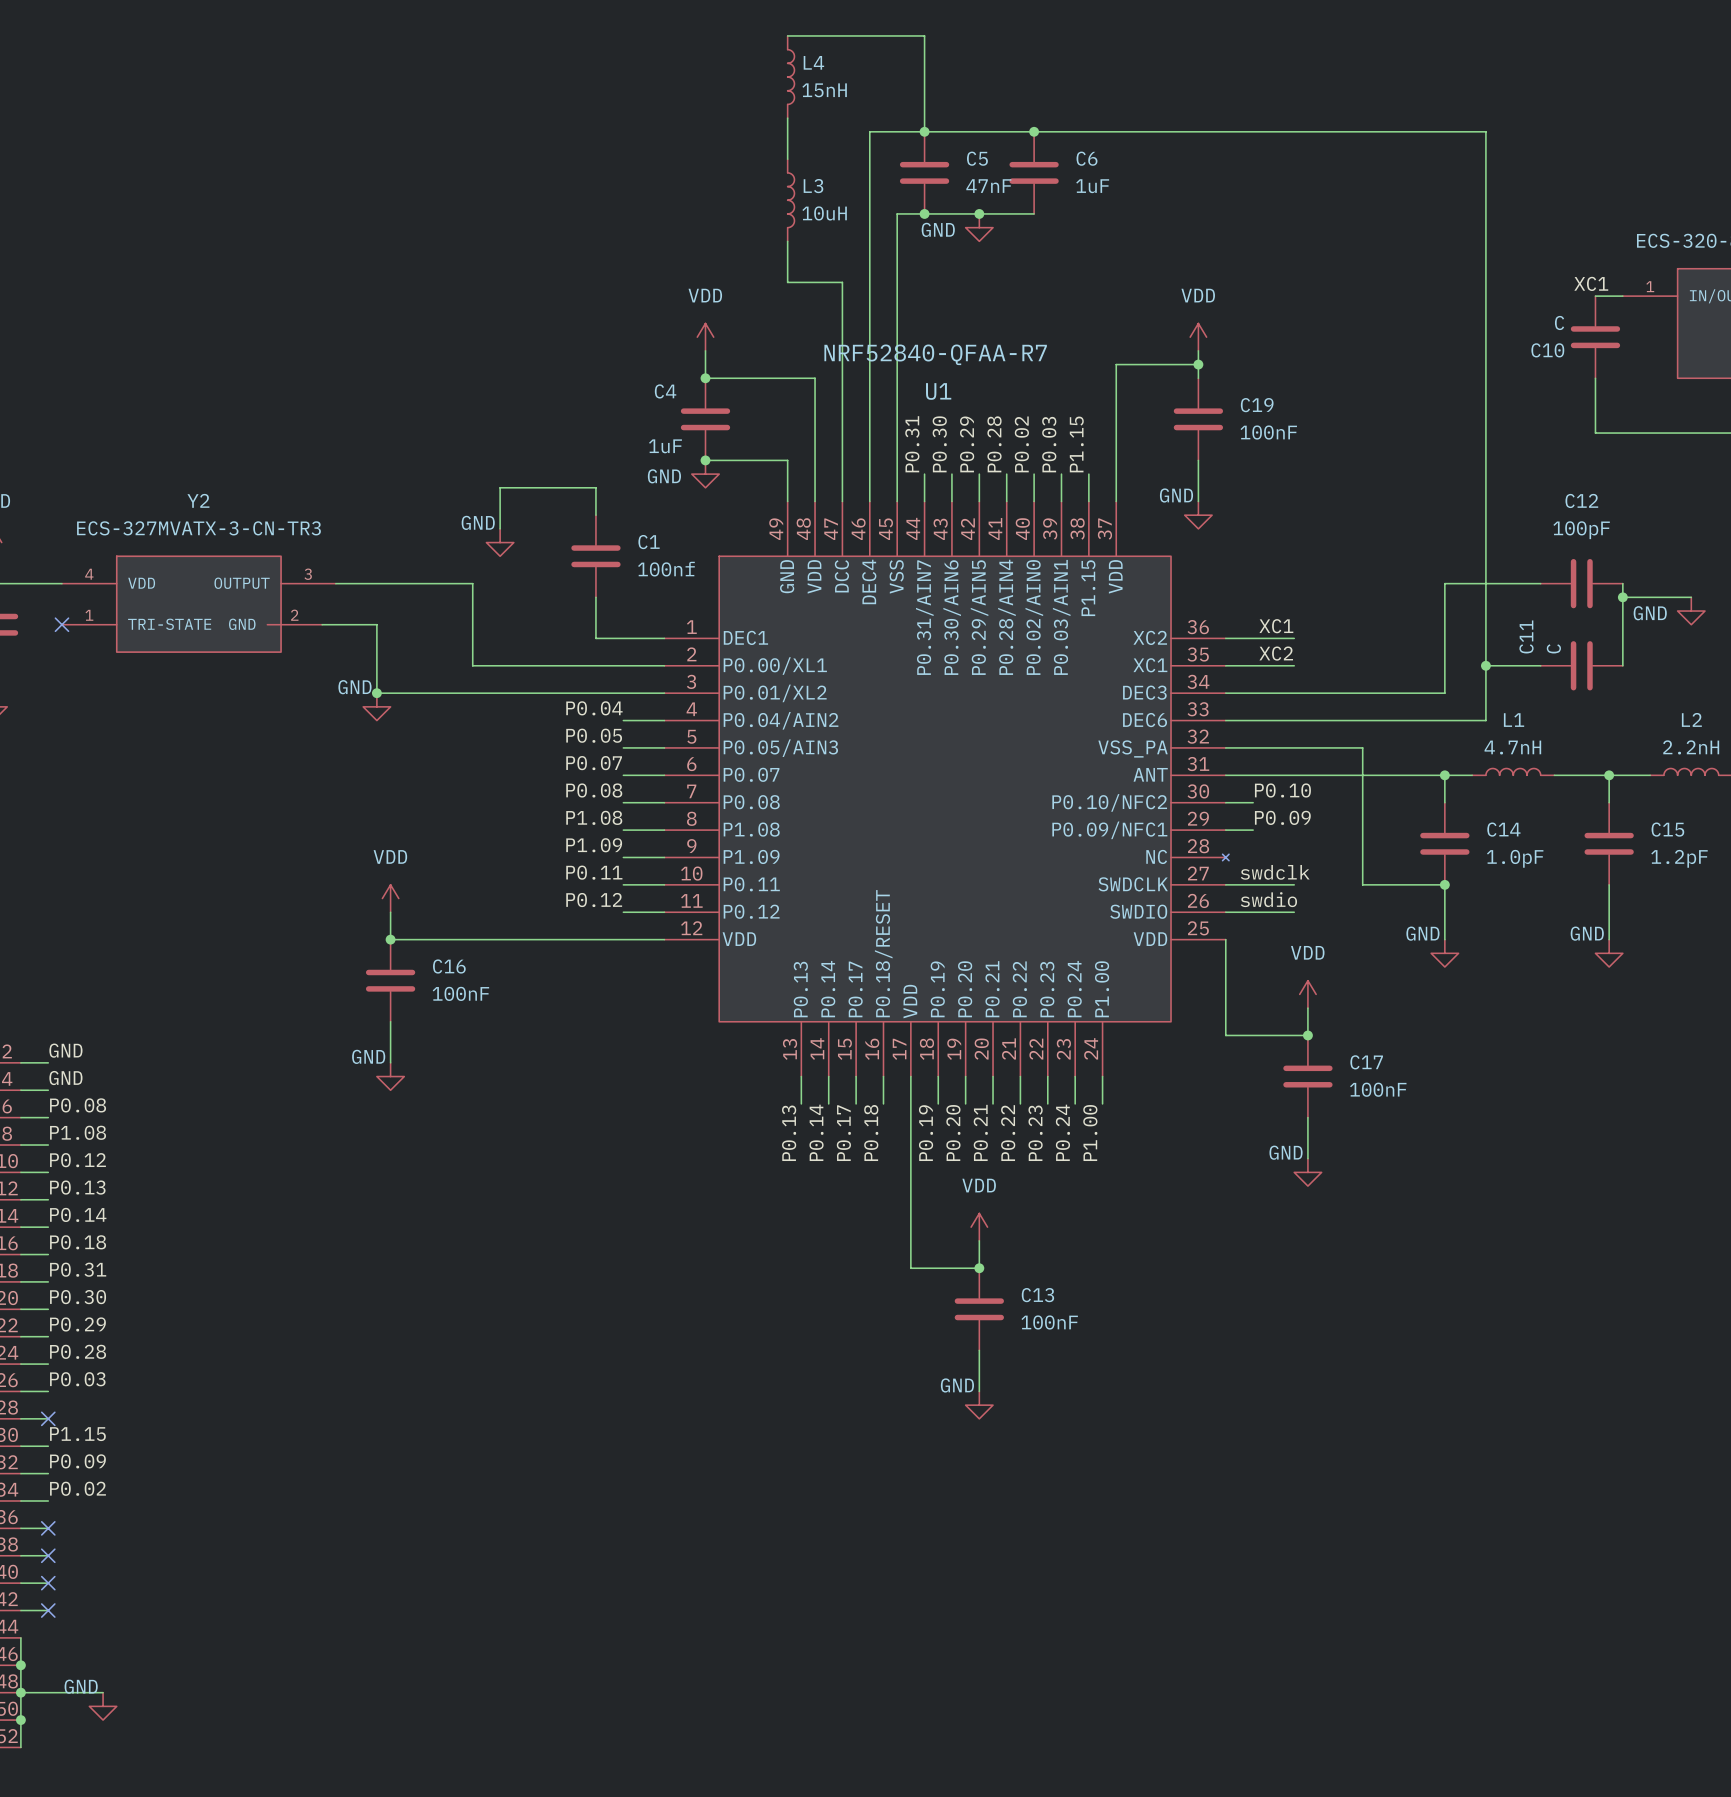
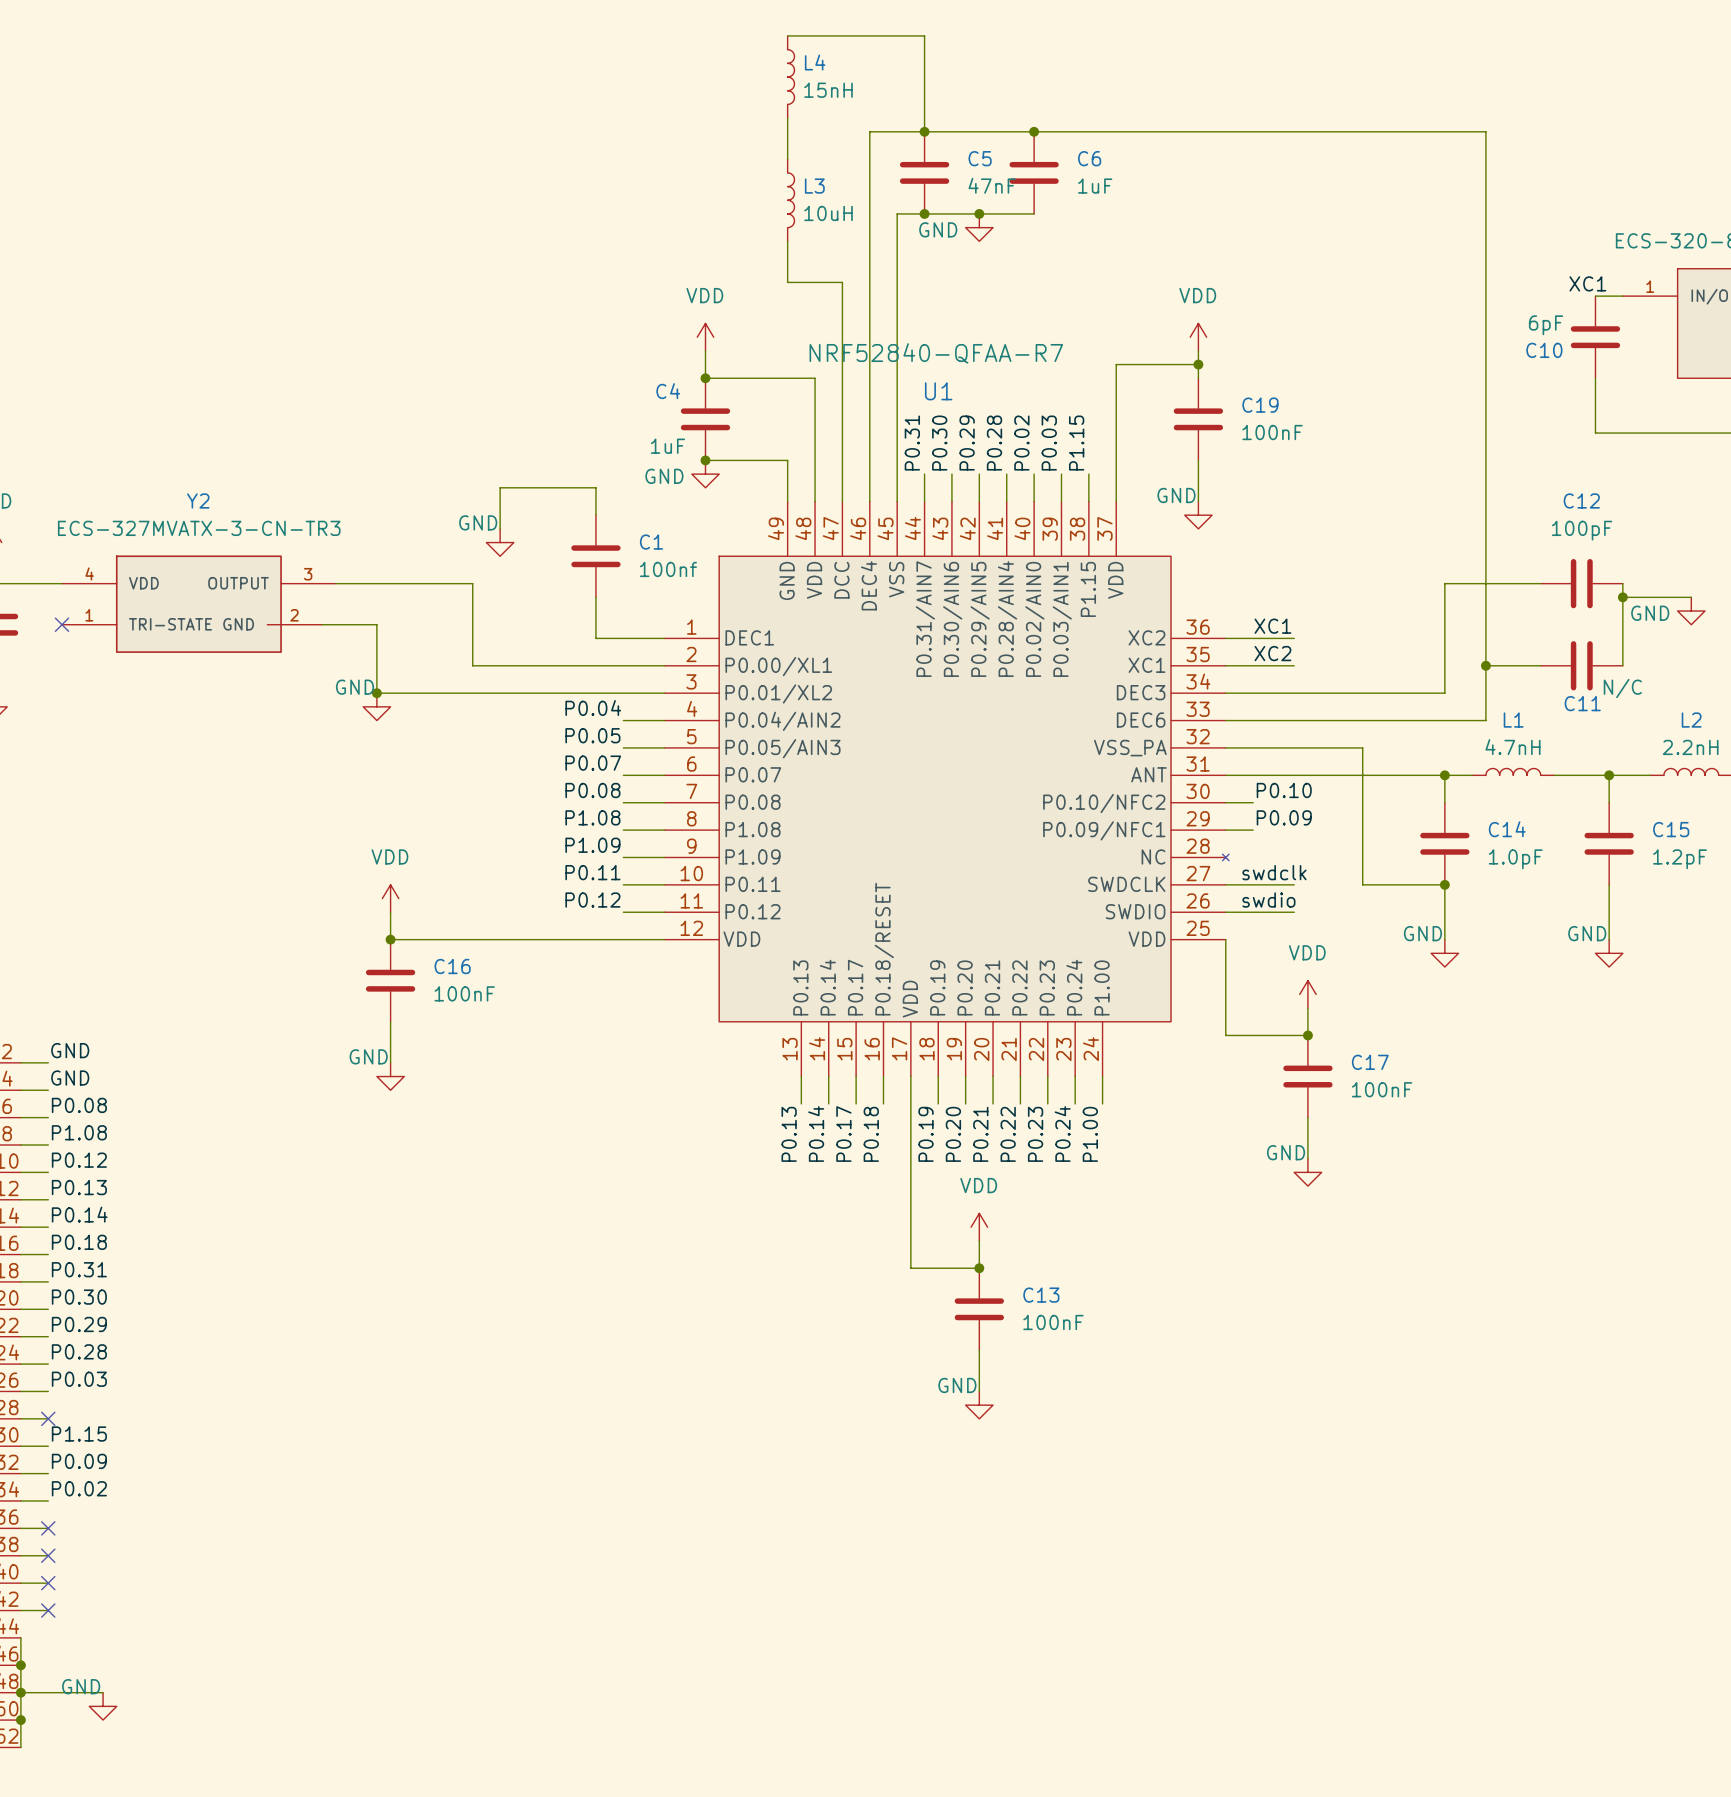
C10 value: C (1559, 322) -> 6pF (1546, 325)
C11 name rotation: 0° (1526, 636) -> 90° clockwise (1582, 703)
C11 name position: C11 (1526, 636) -> C11 (1582, 703)
C11 value: C (1553, 648) -> N/C (1622, 688)

